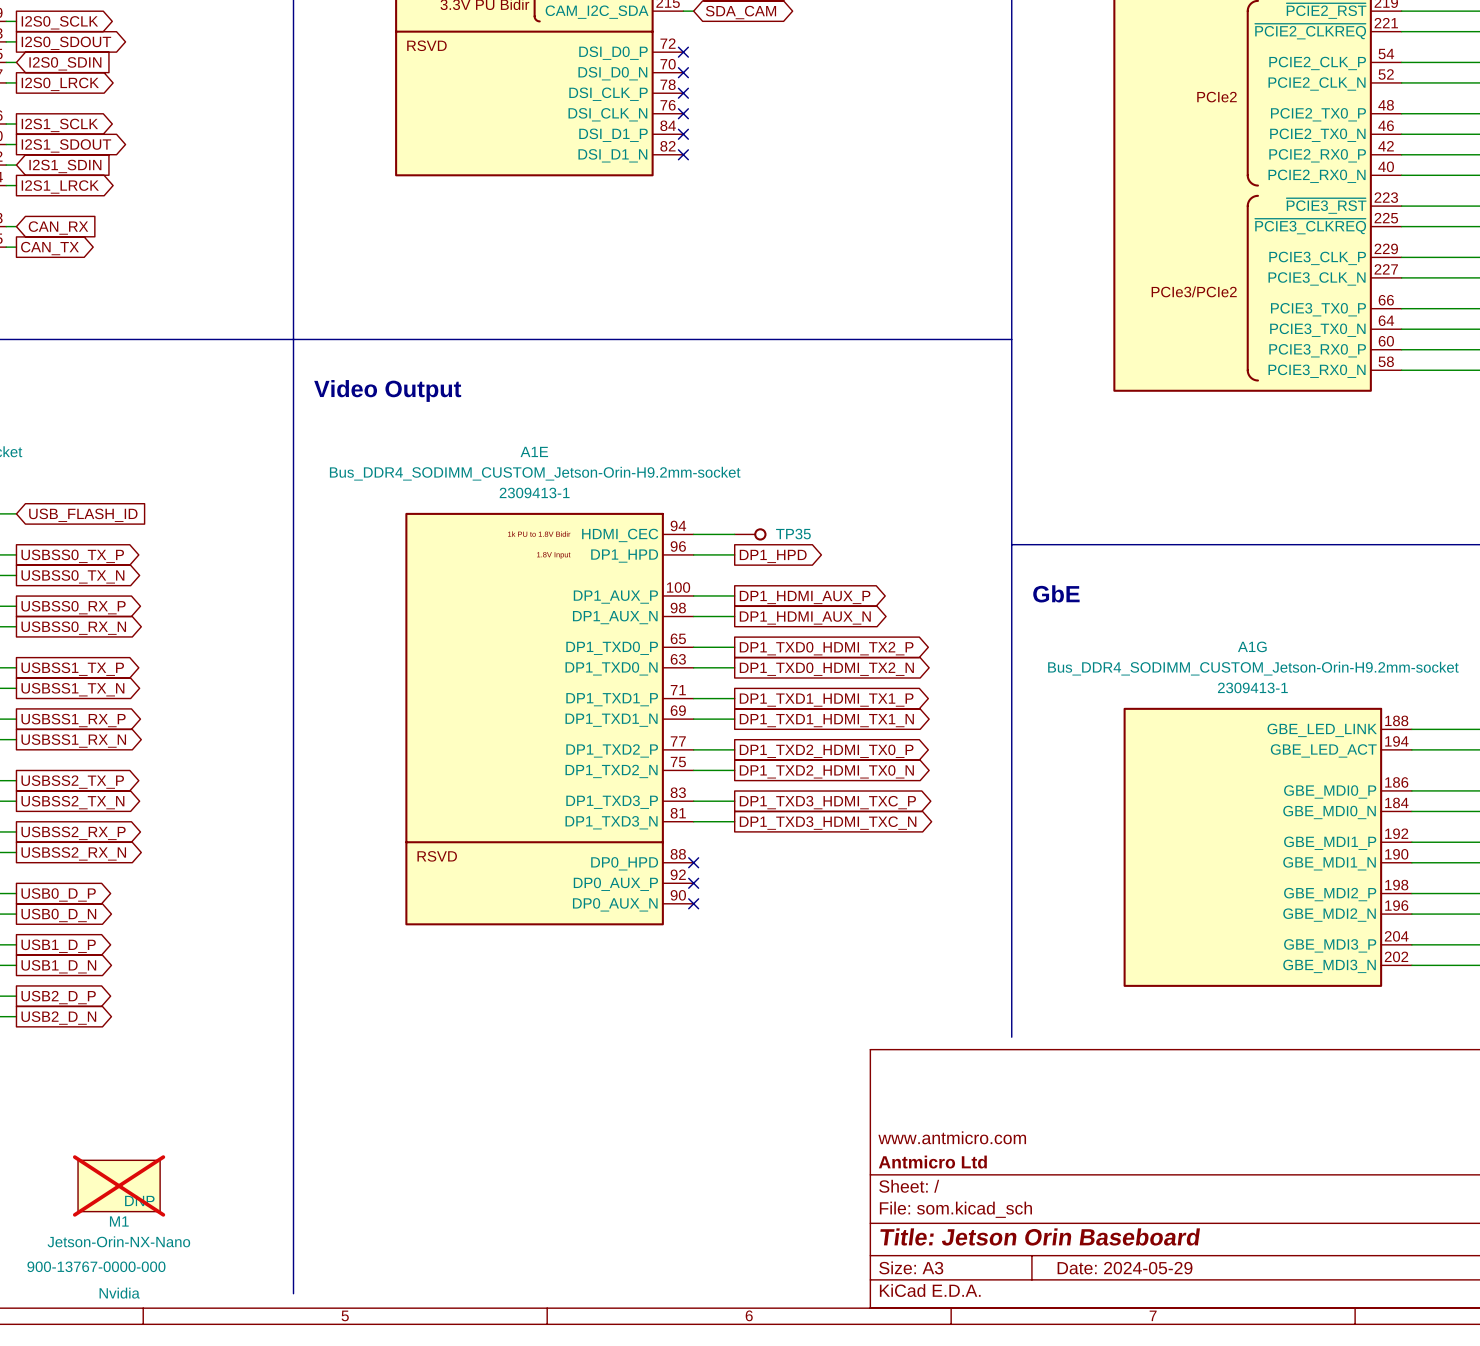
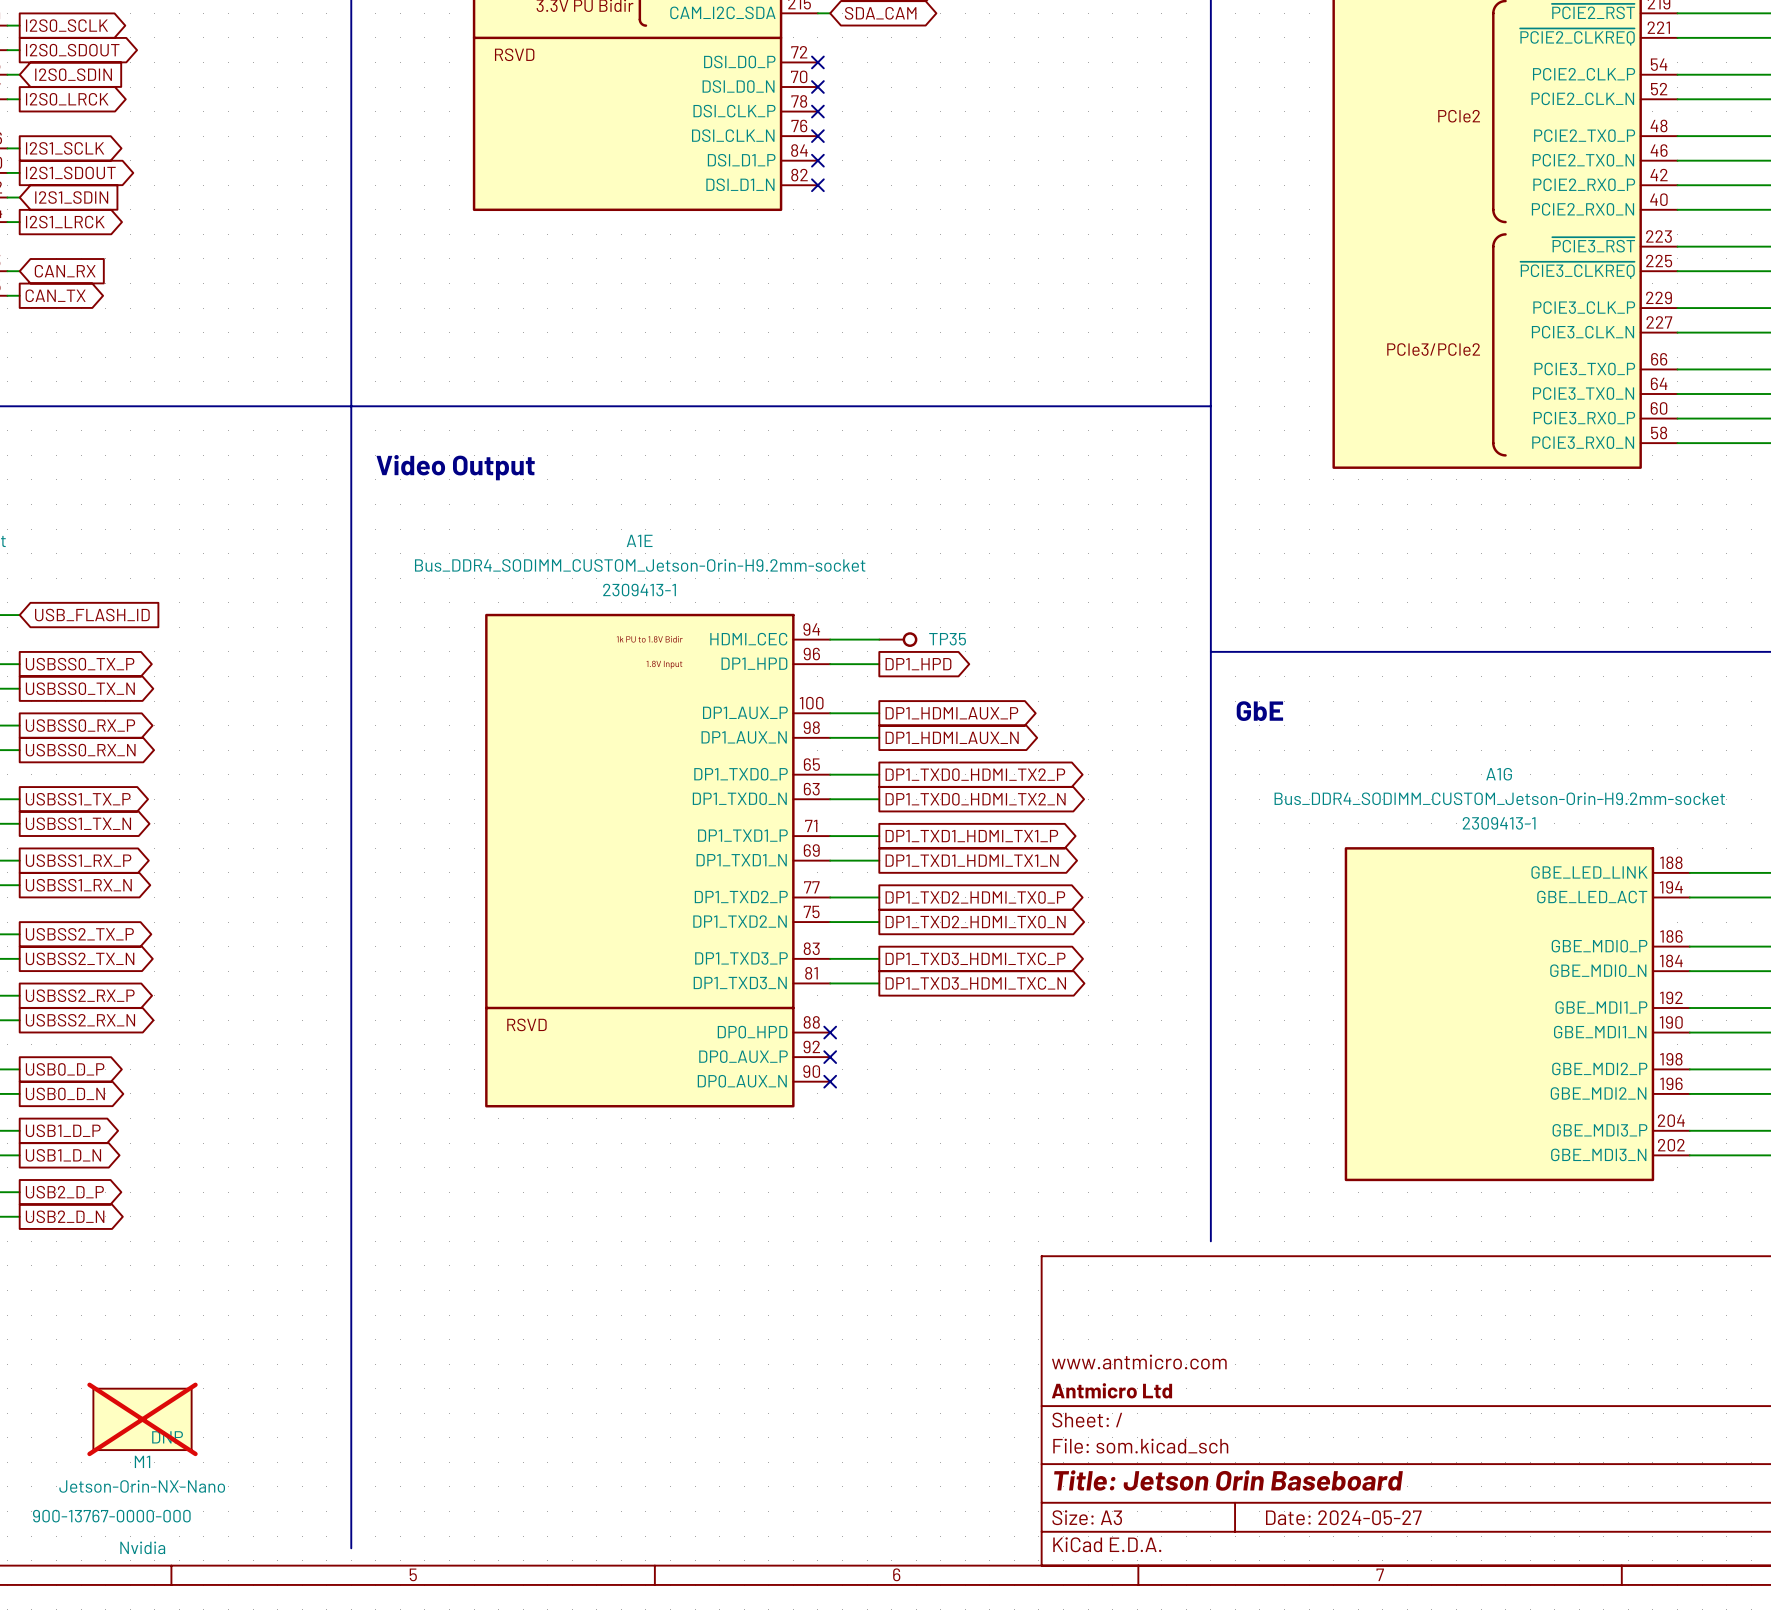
title block: Date: 2024-05-29 (1125, 1268) -> Date: 2024-05-27 (1343, 1517)

